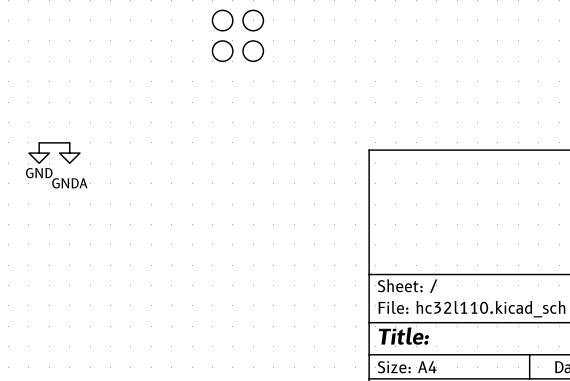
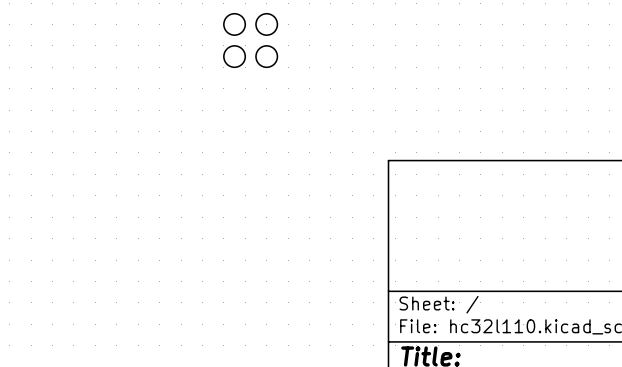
wire: (39, 142) (69, 142) -> none
power symbol: GND (39, 153) -> none
power symbol: GNDA (69, 153) -> none

